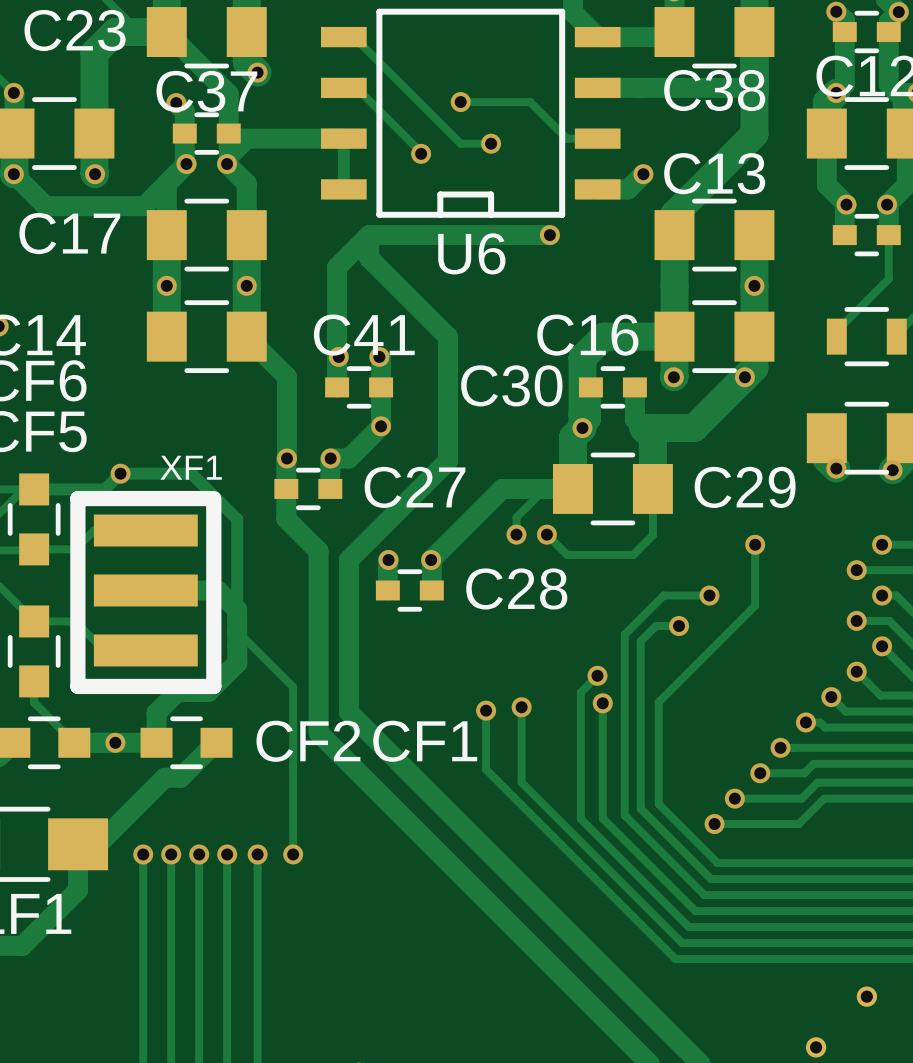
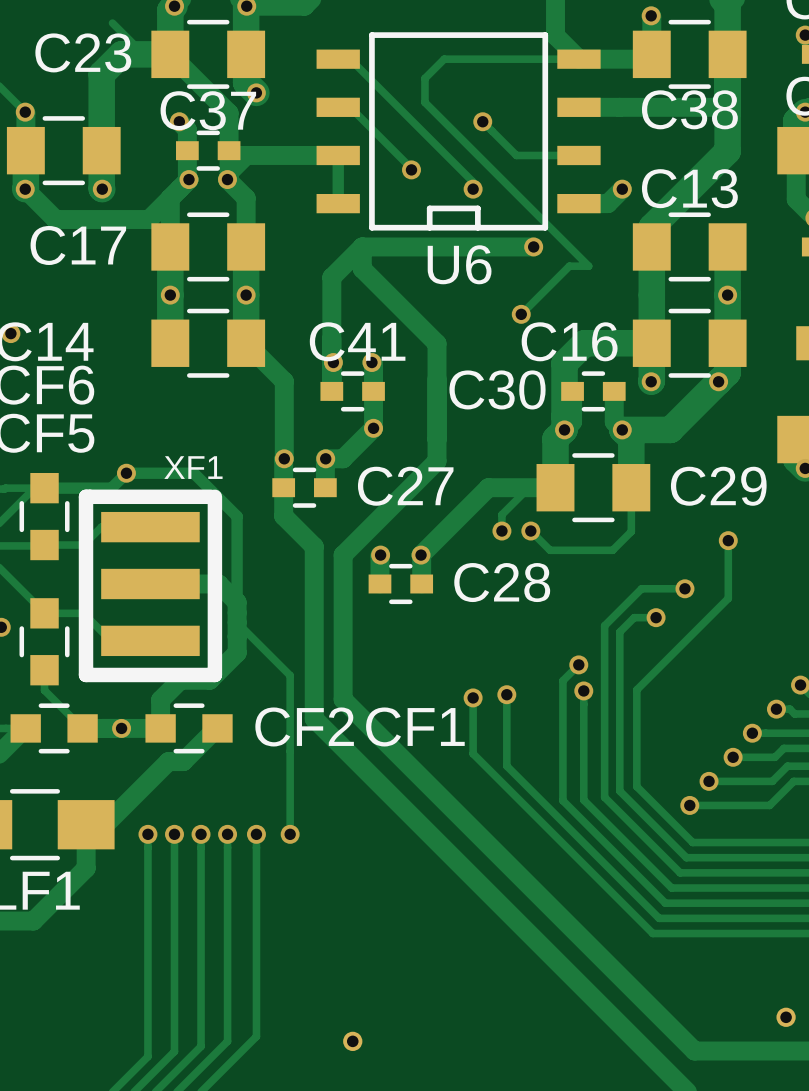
track: (354, 37) (460, 143) (491, 143) -> none
track: none -> (350, 59) (473, 182) (473, 189)
track: none -> (578, 59) (444, 59) (424, 78) (424, 102) (588, 266) (569, 266) (521, 314)
track: (460, 102) (530, 102) (566, 138) -> (482, 121) (516, 155) (549, 155)
via: (460, 102) -> none
via: none -> (482, 121)
via: (491, 143) -> none
via: none -> (473, 189)
via: none -> (521, 314)
via: none -> (622, 429)

